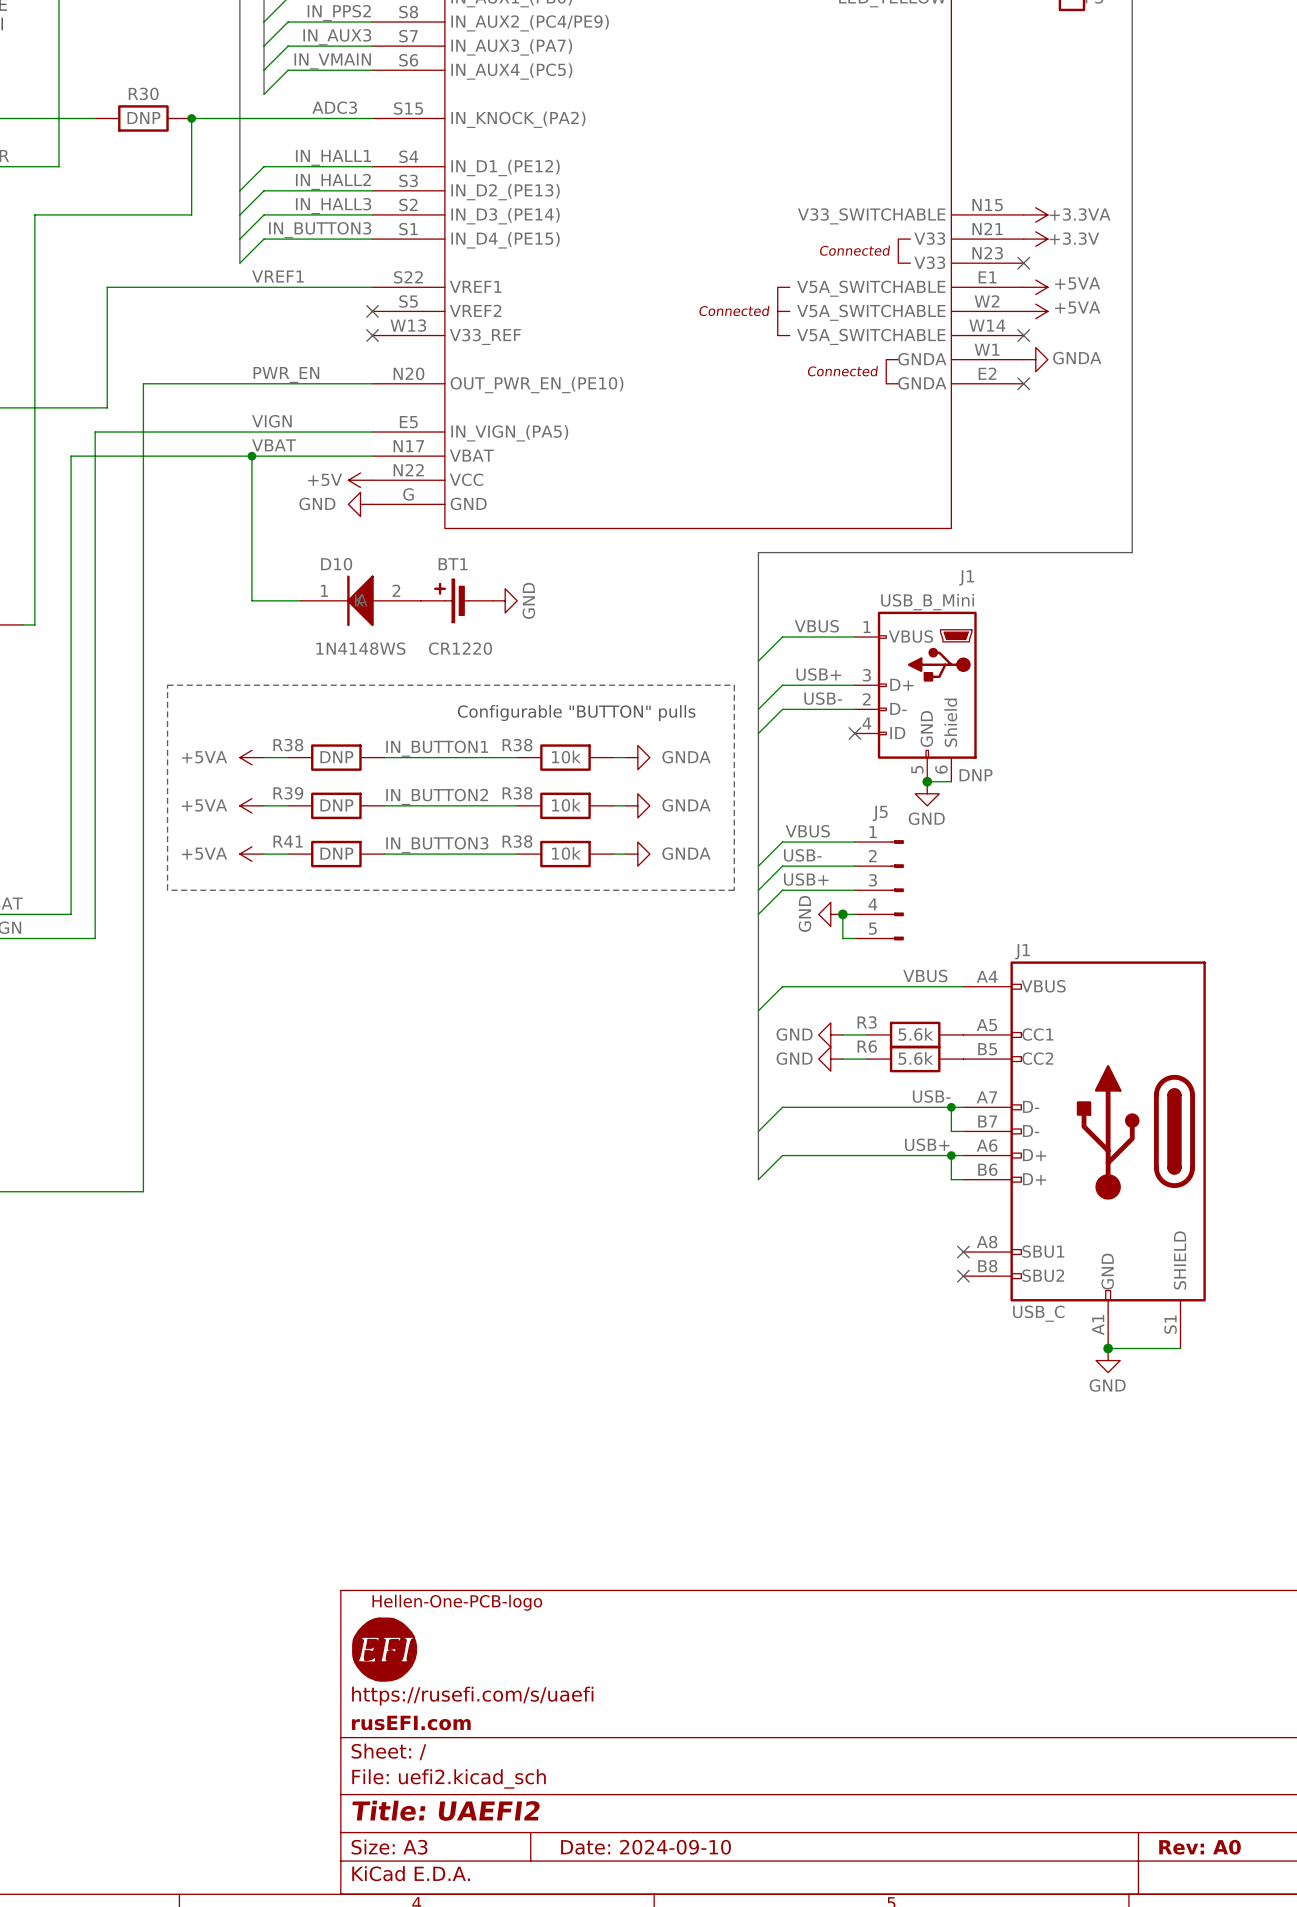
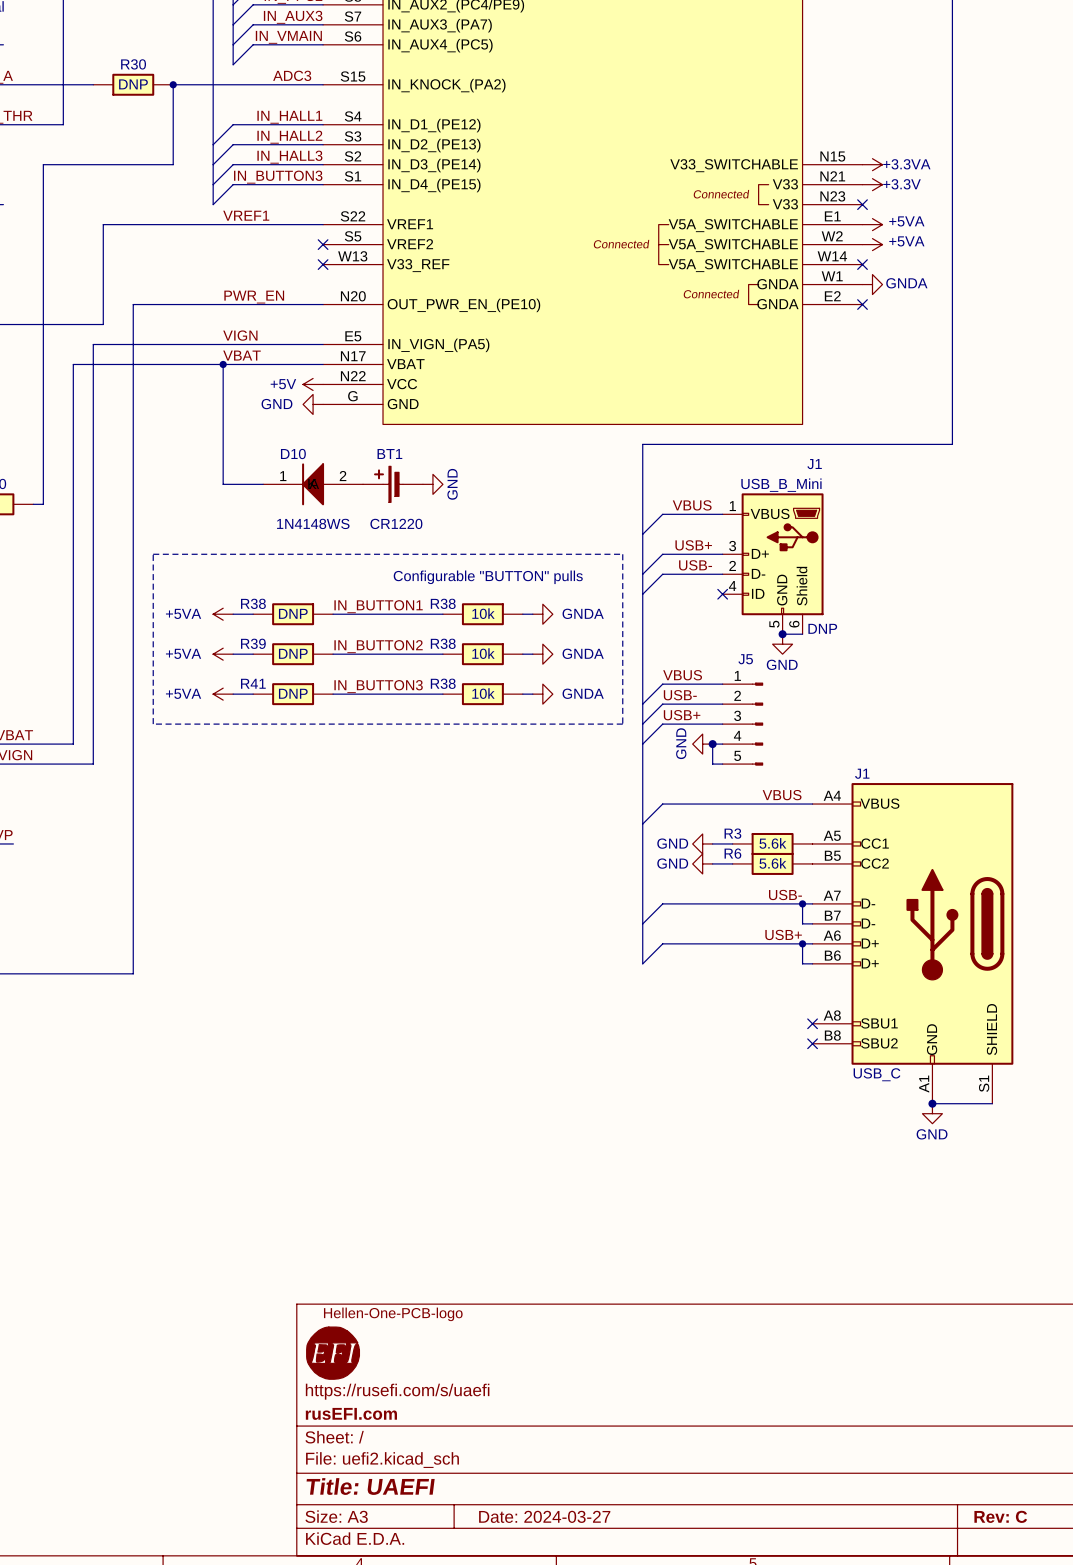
title block: Title: UAEFI2 (446, 1810) -> Title: UAEFI (370, 1486)
title block: Date: 2024-09-10 (646, 1847) -> Date: 2024-03-27 (544, 1516)
title block: Rev: A0 (1200, 1847) -> Rev: C (1000, 1516)

